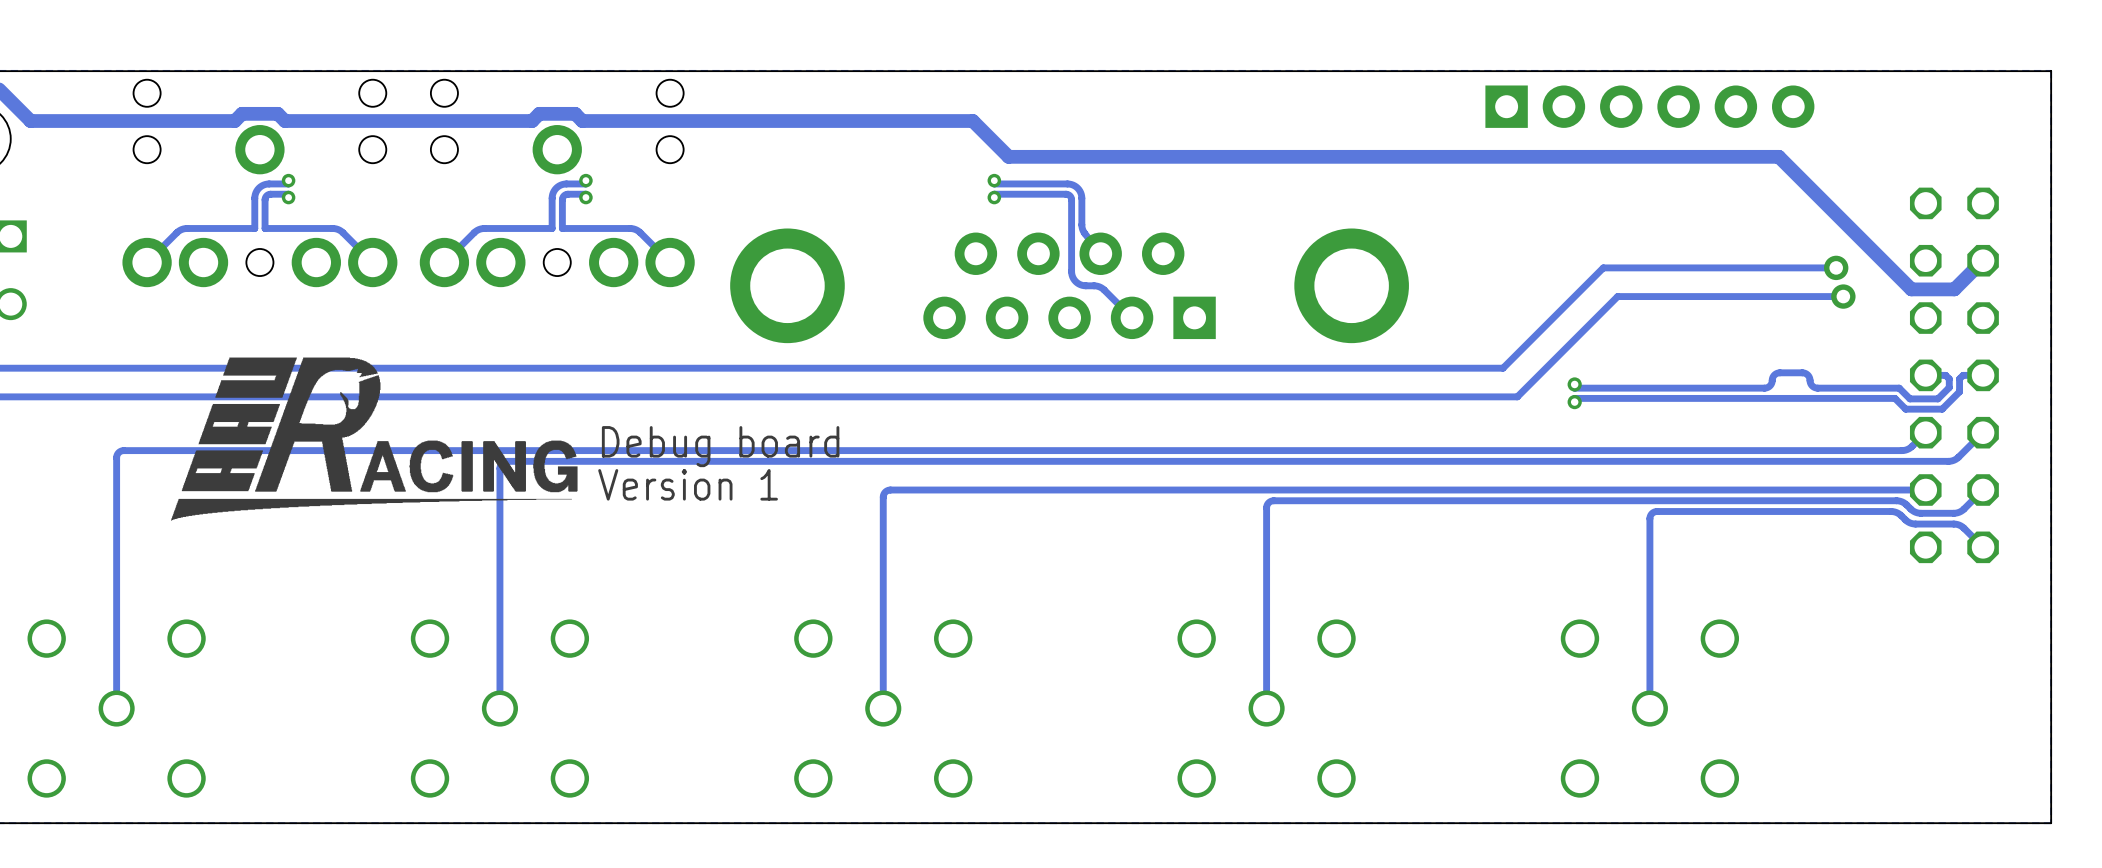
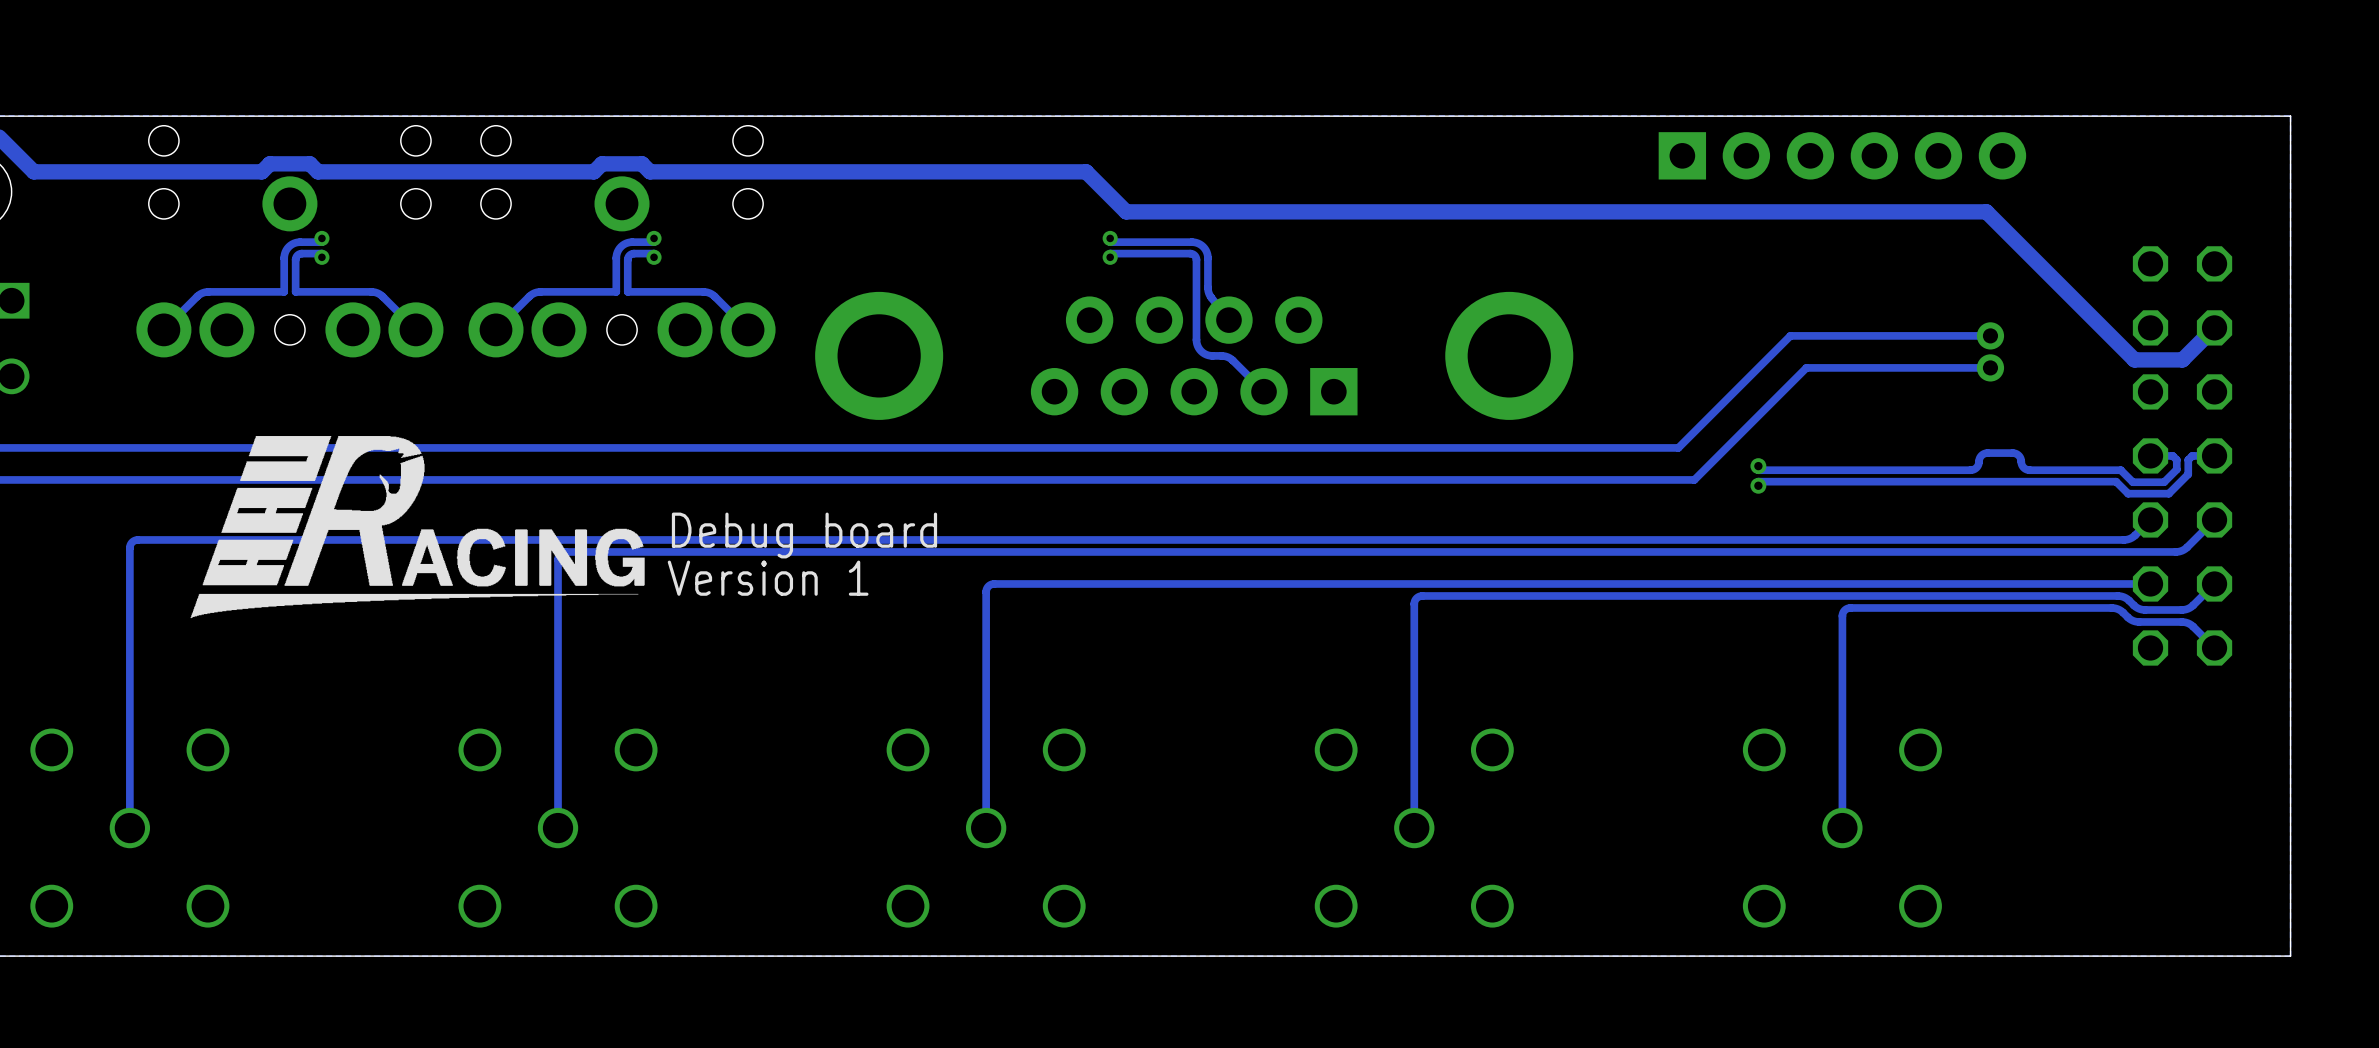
via: none -> (1990, 335)
track: (1836, 267) (1782, 267) -> none
via: (1836, 267) -> none
via: none -> (1990, 367)
track: (1843, 296) (1782, 296) -> none
via: (1843, 296) -> none

